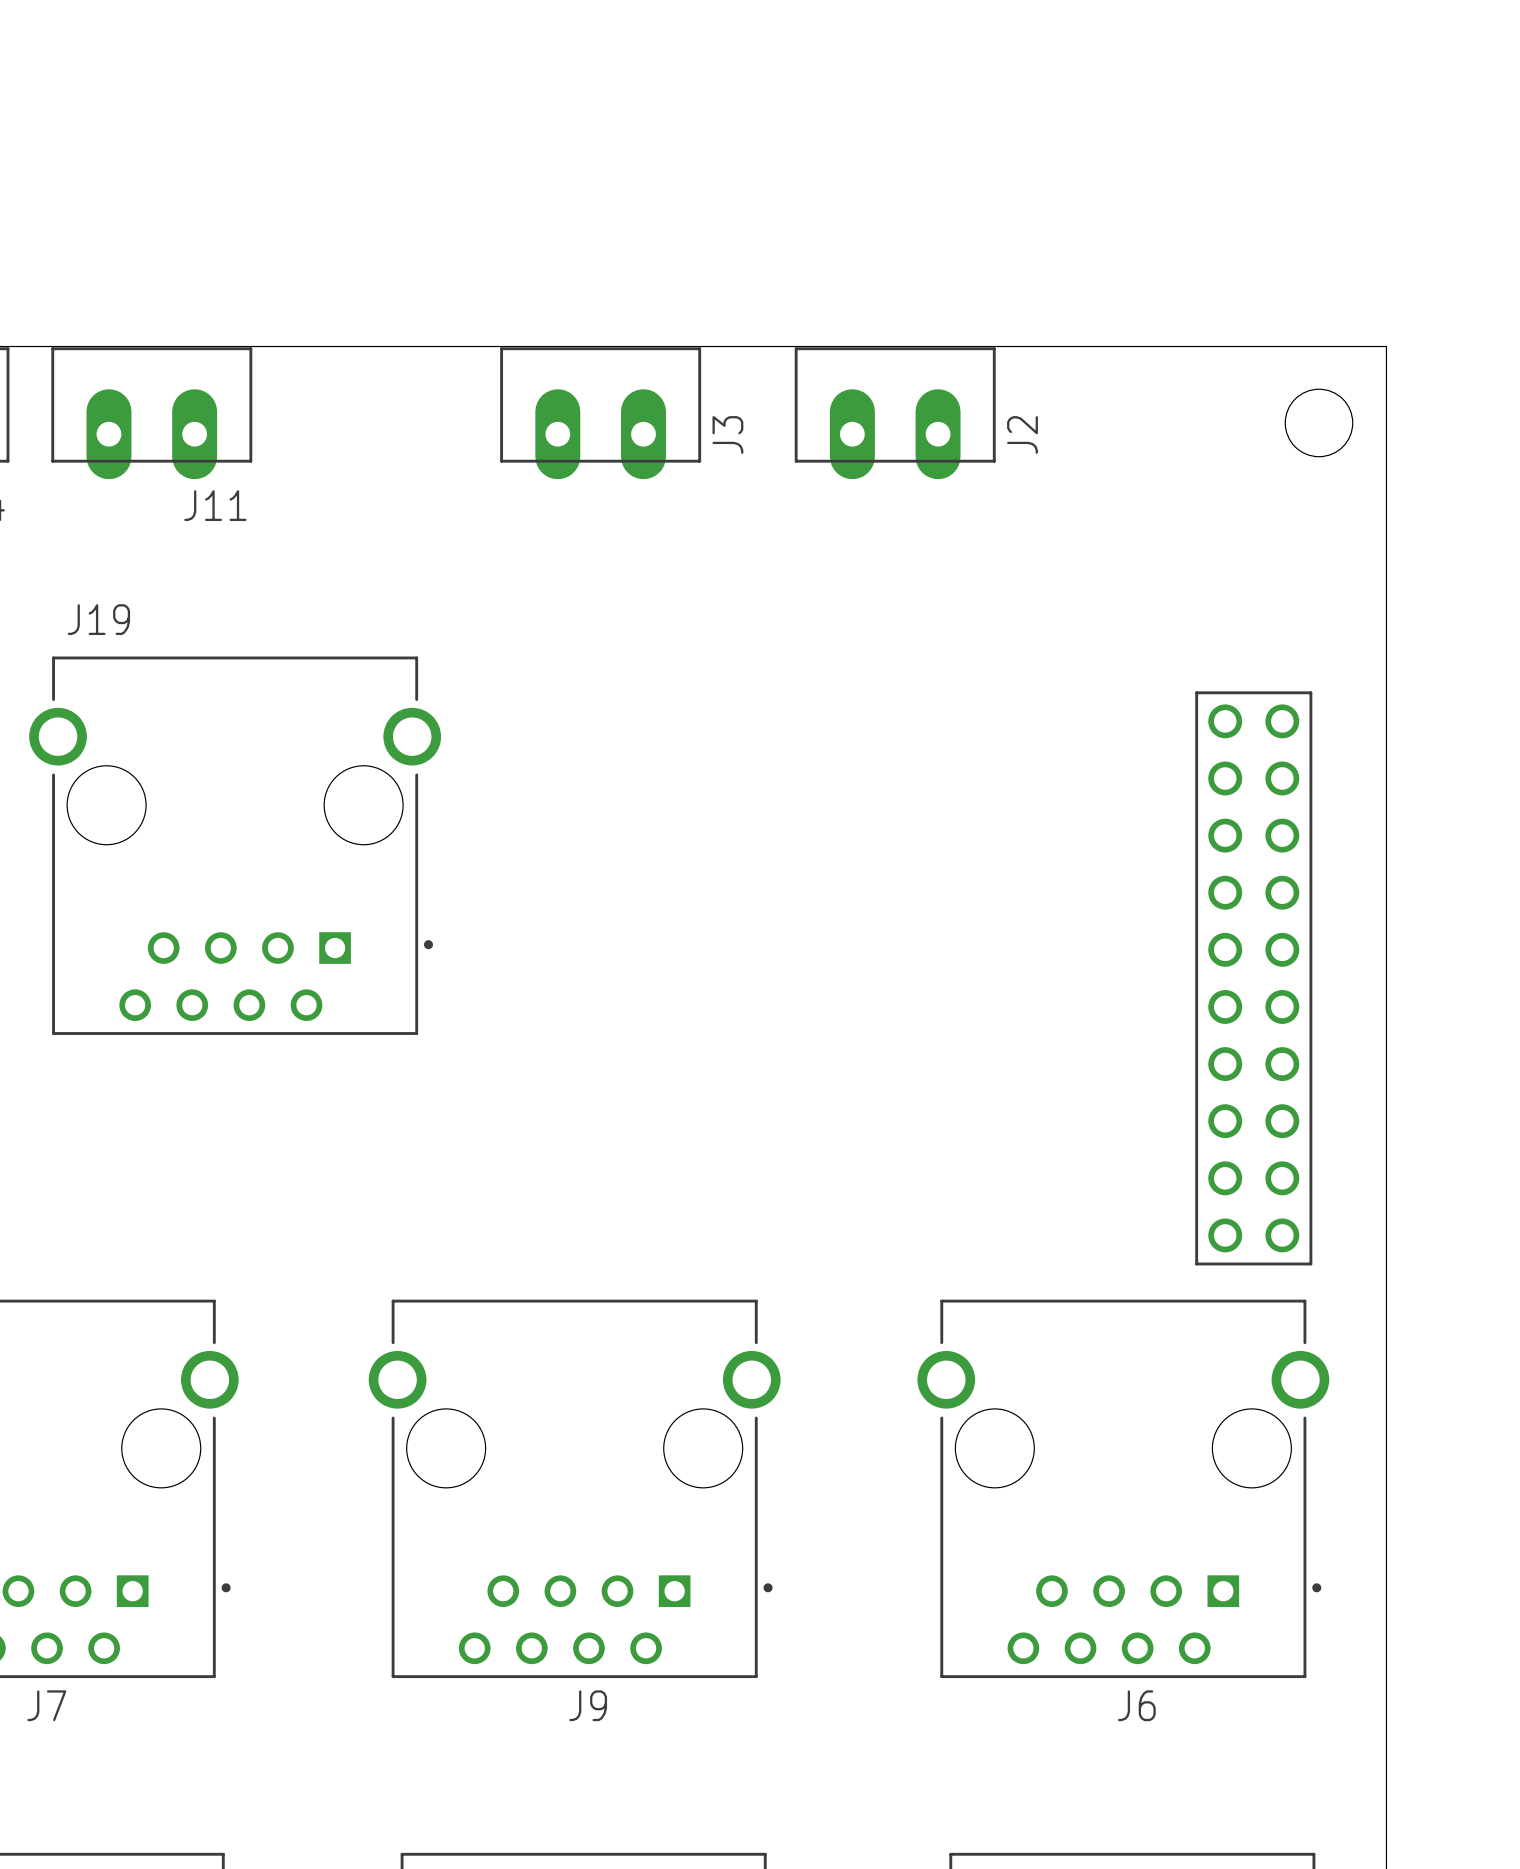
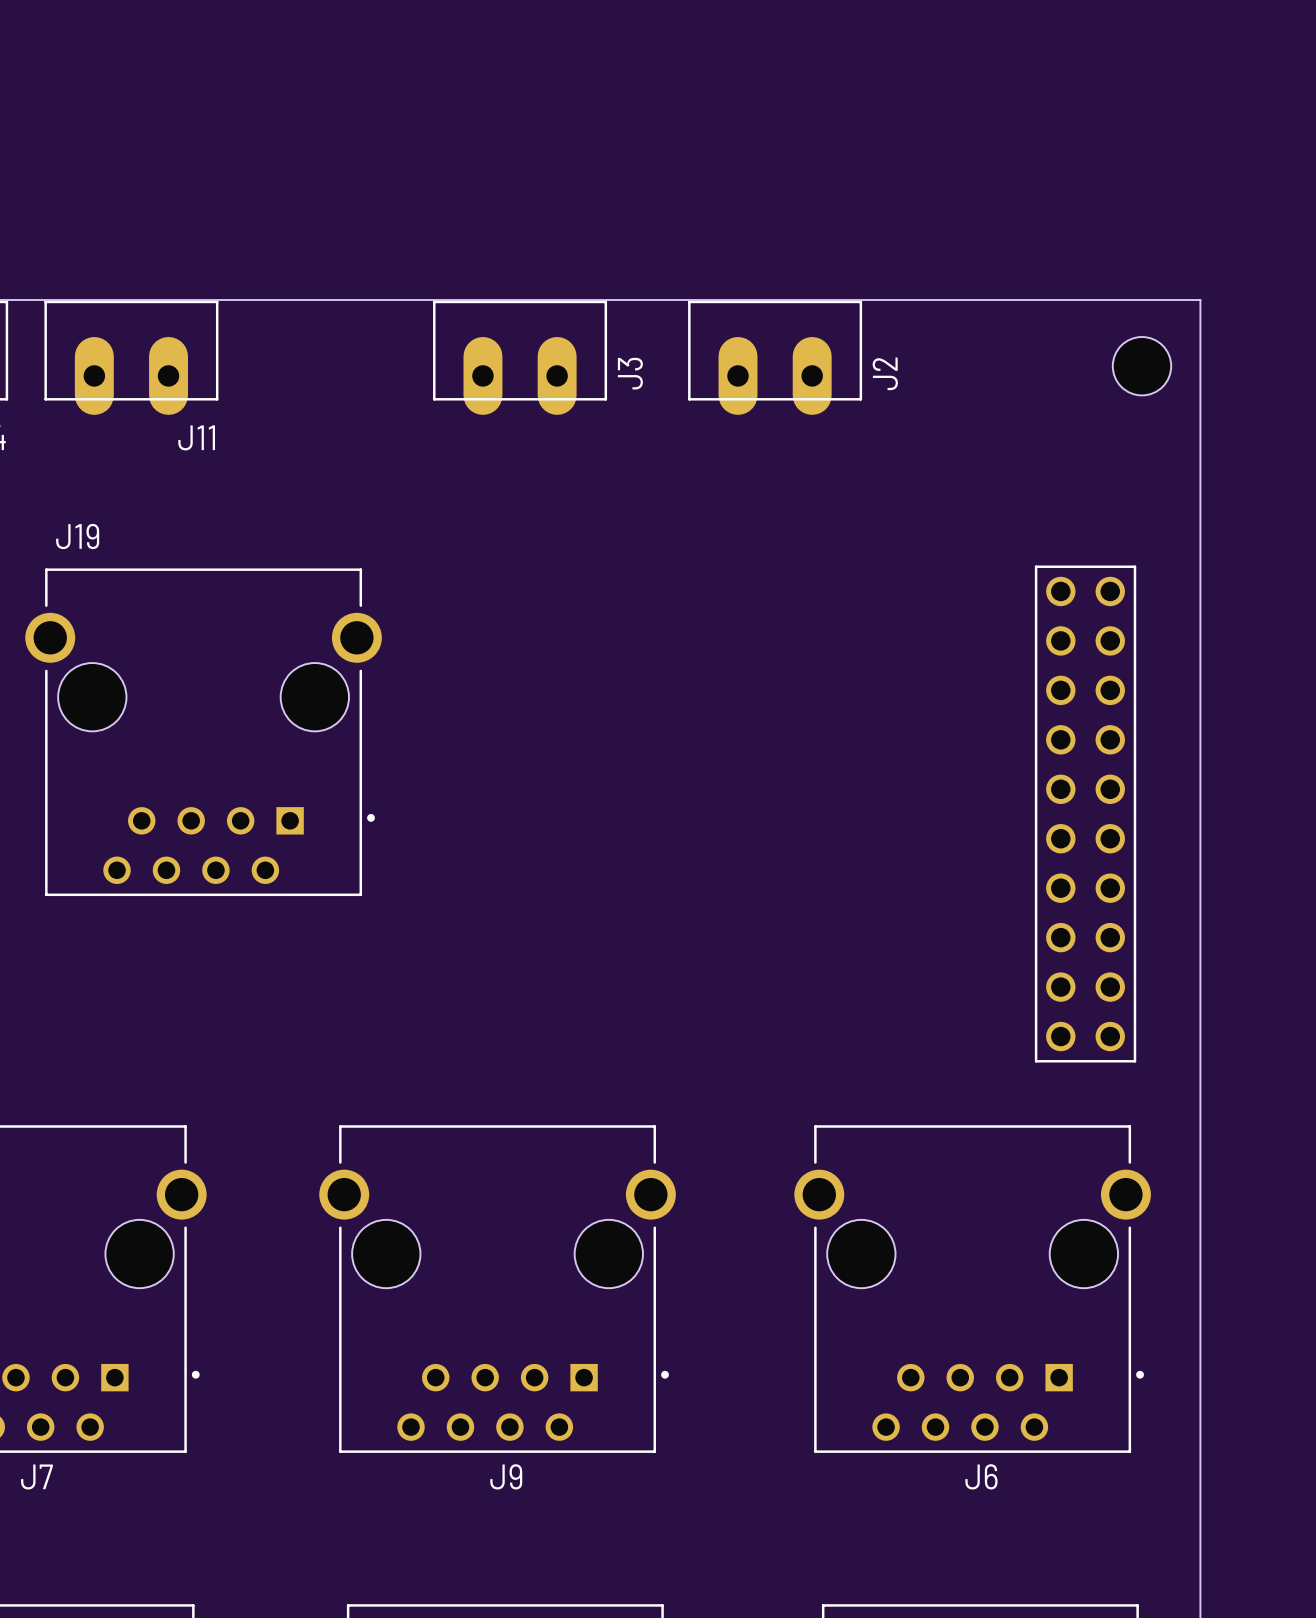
part position: (1253, 978) -> (1085, 814)

